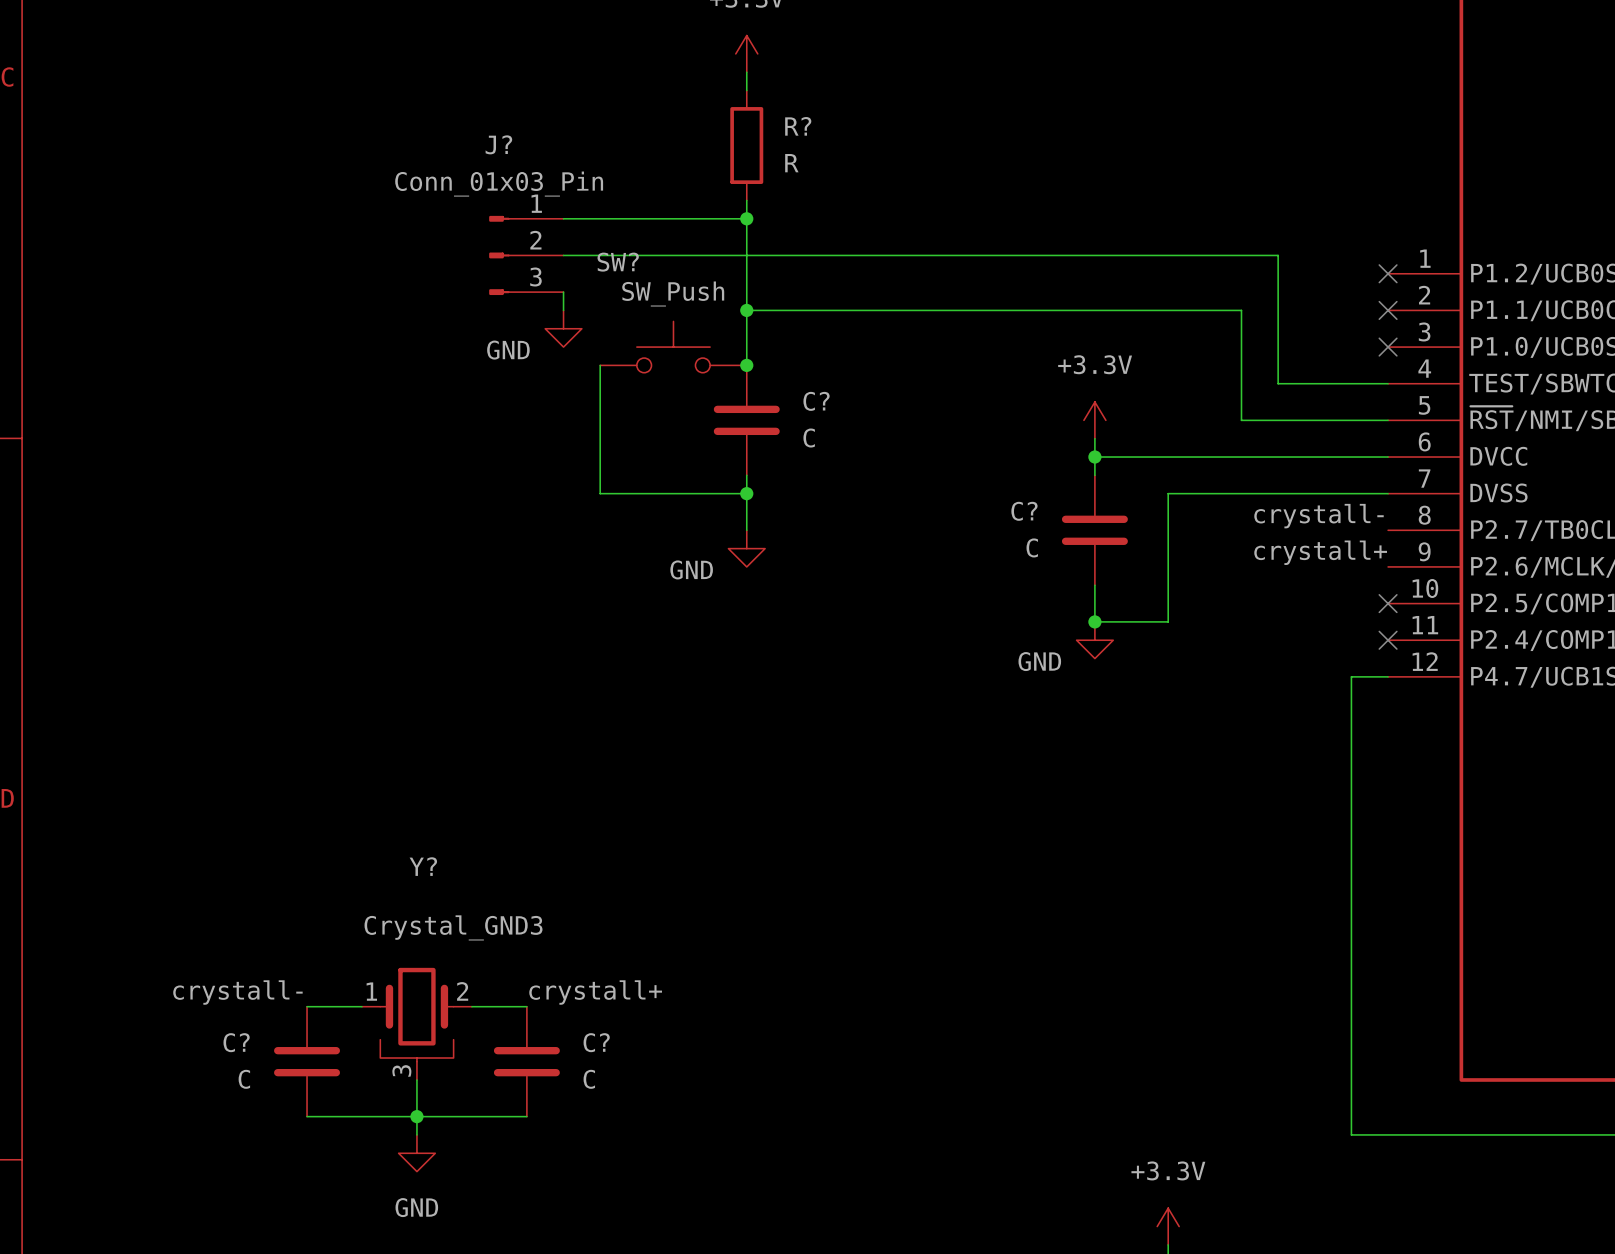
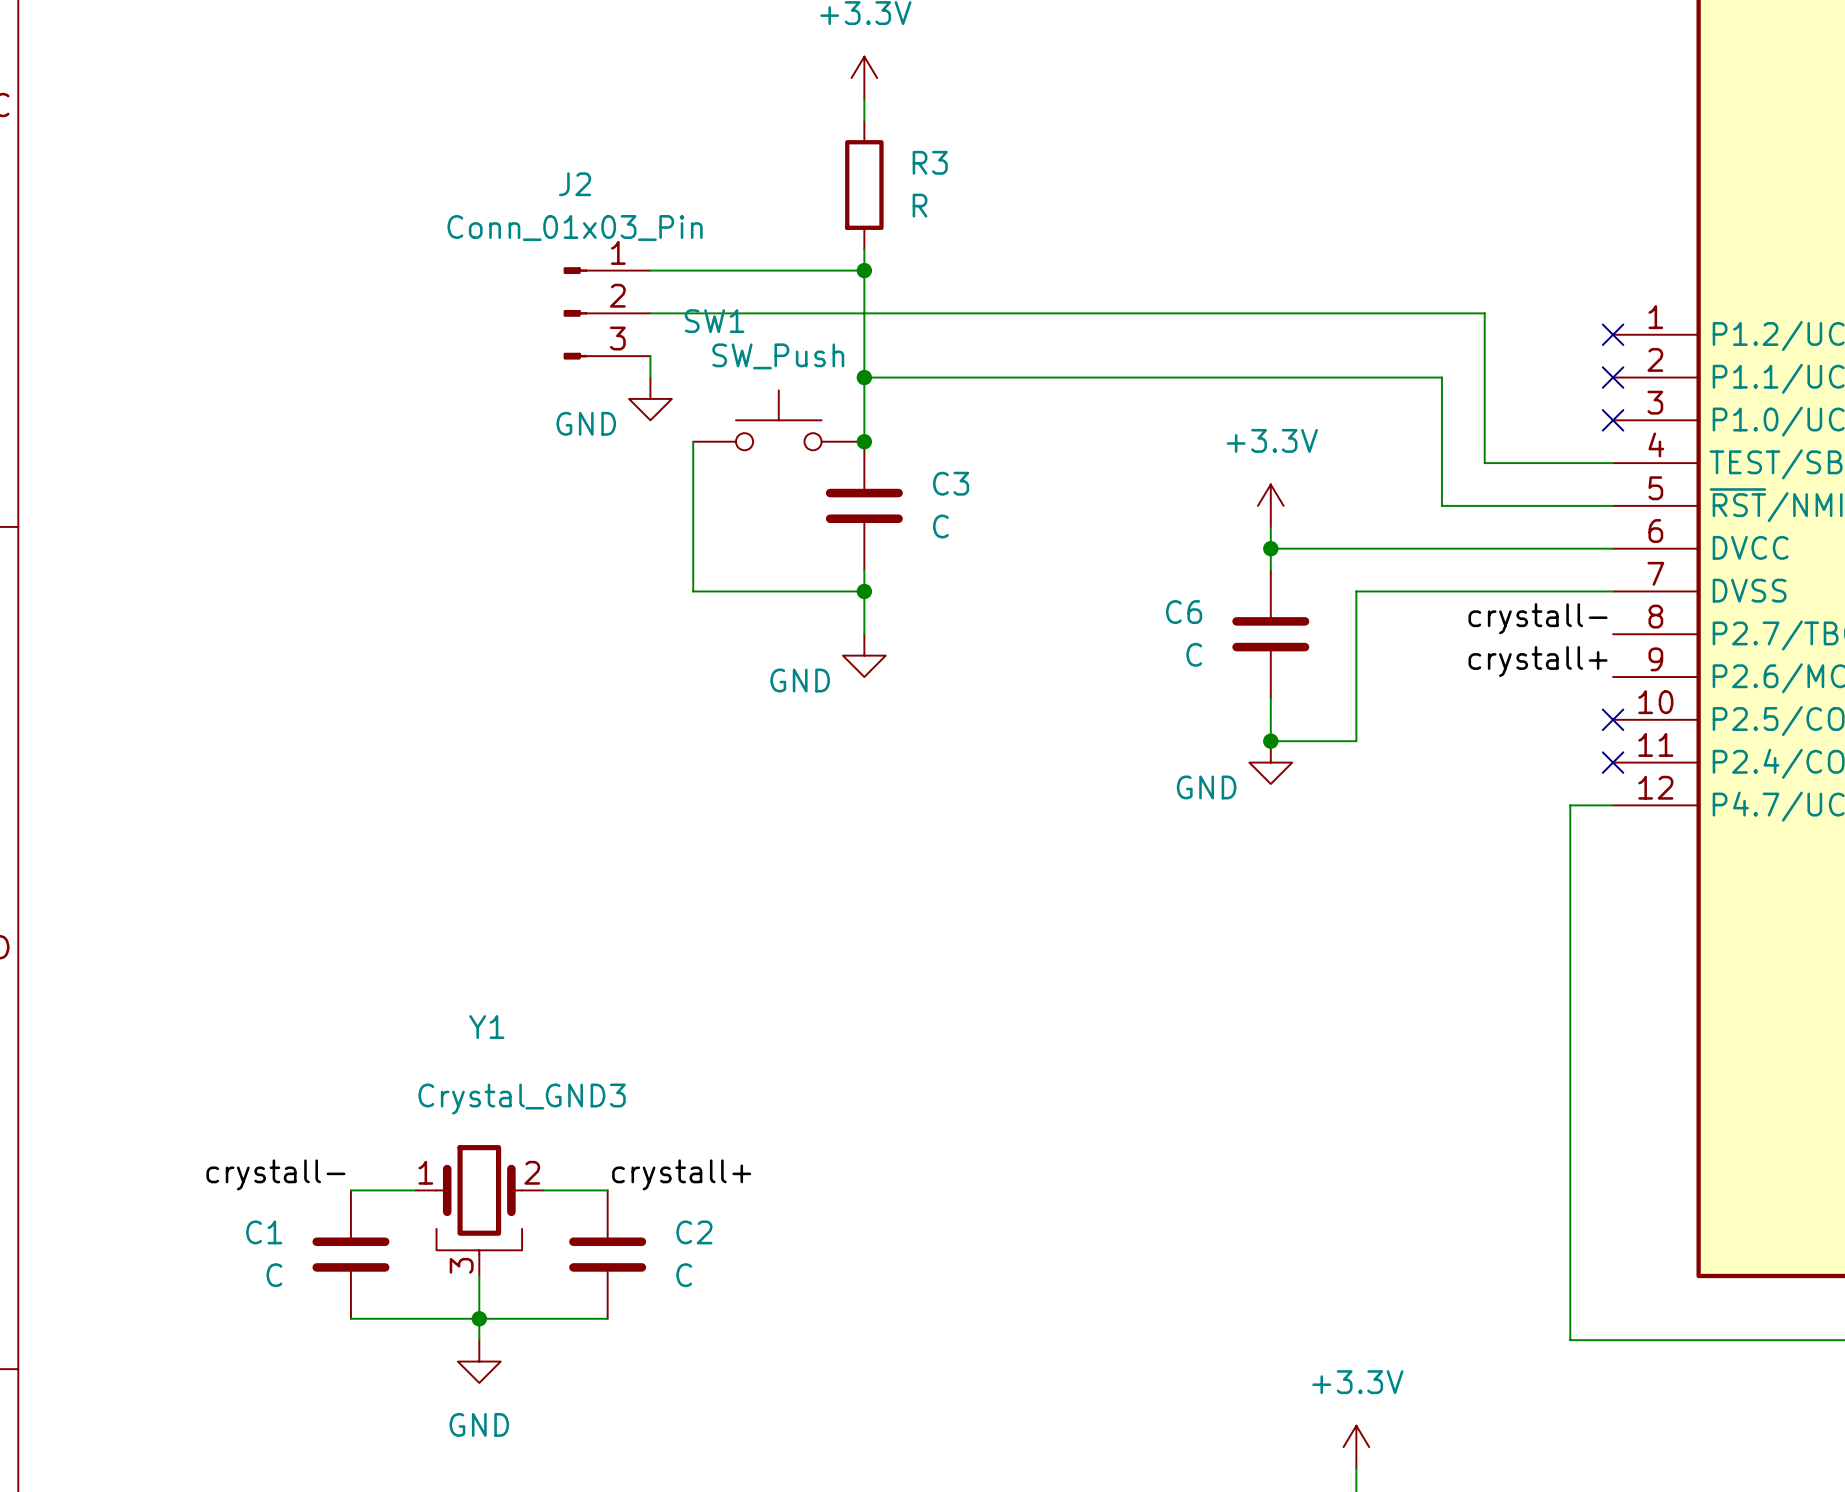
R? name: R? (798, 126) -> R3 (930, 162)
J? name: J? (498, 144) -> J2 (575, 184)
SW? name: SW? (618, 262) -> SW1 (714, 321)
C? name: C? (816, 401) -> C3 (951, 483)
C? name: C? (1024, 511) -> C6 (1184, 612)
Y? name: Y? (423, 866) -> Y1 (486, 1027)
C? name: C? (236, 1042) -> C1 (264, 1232)
C? name: C? (596, 1042) -> C2 (694, 1232)

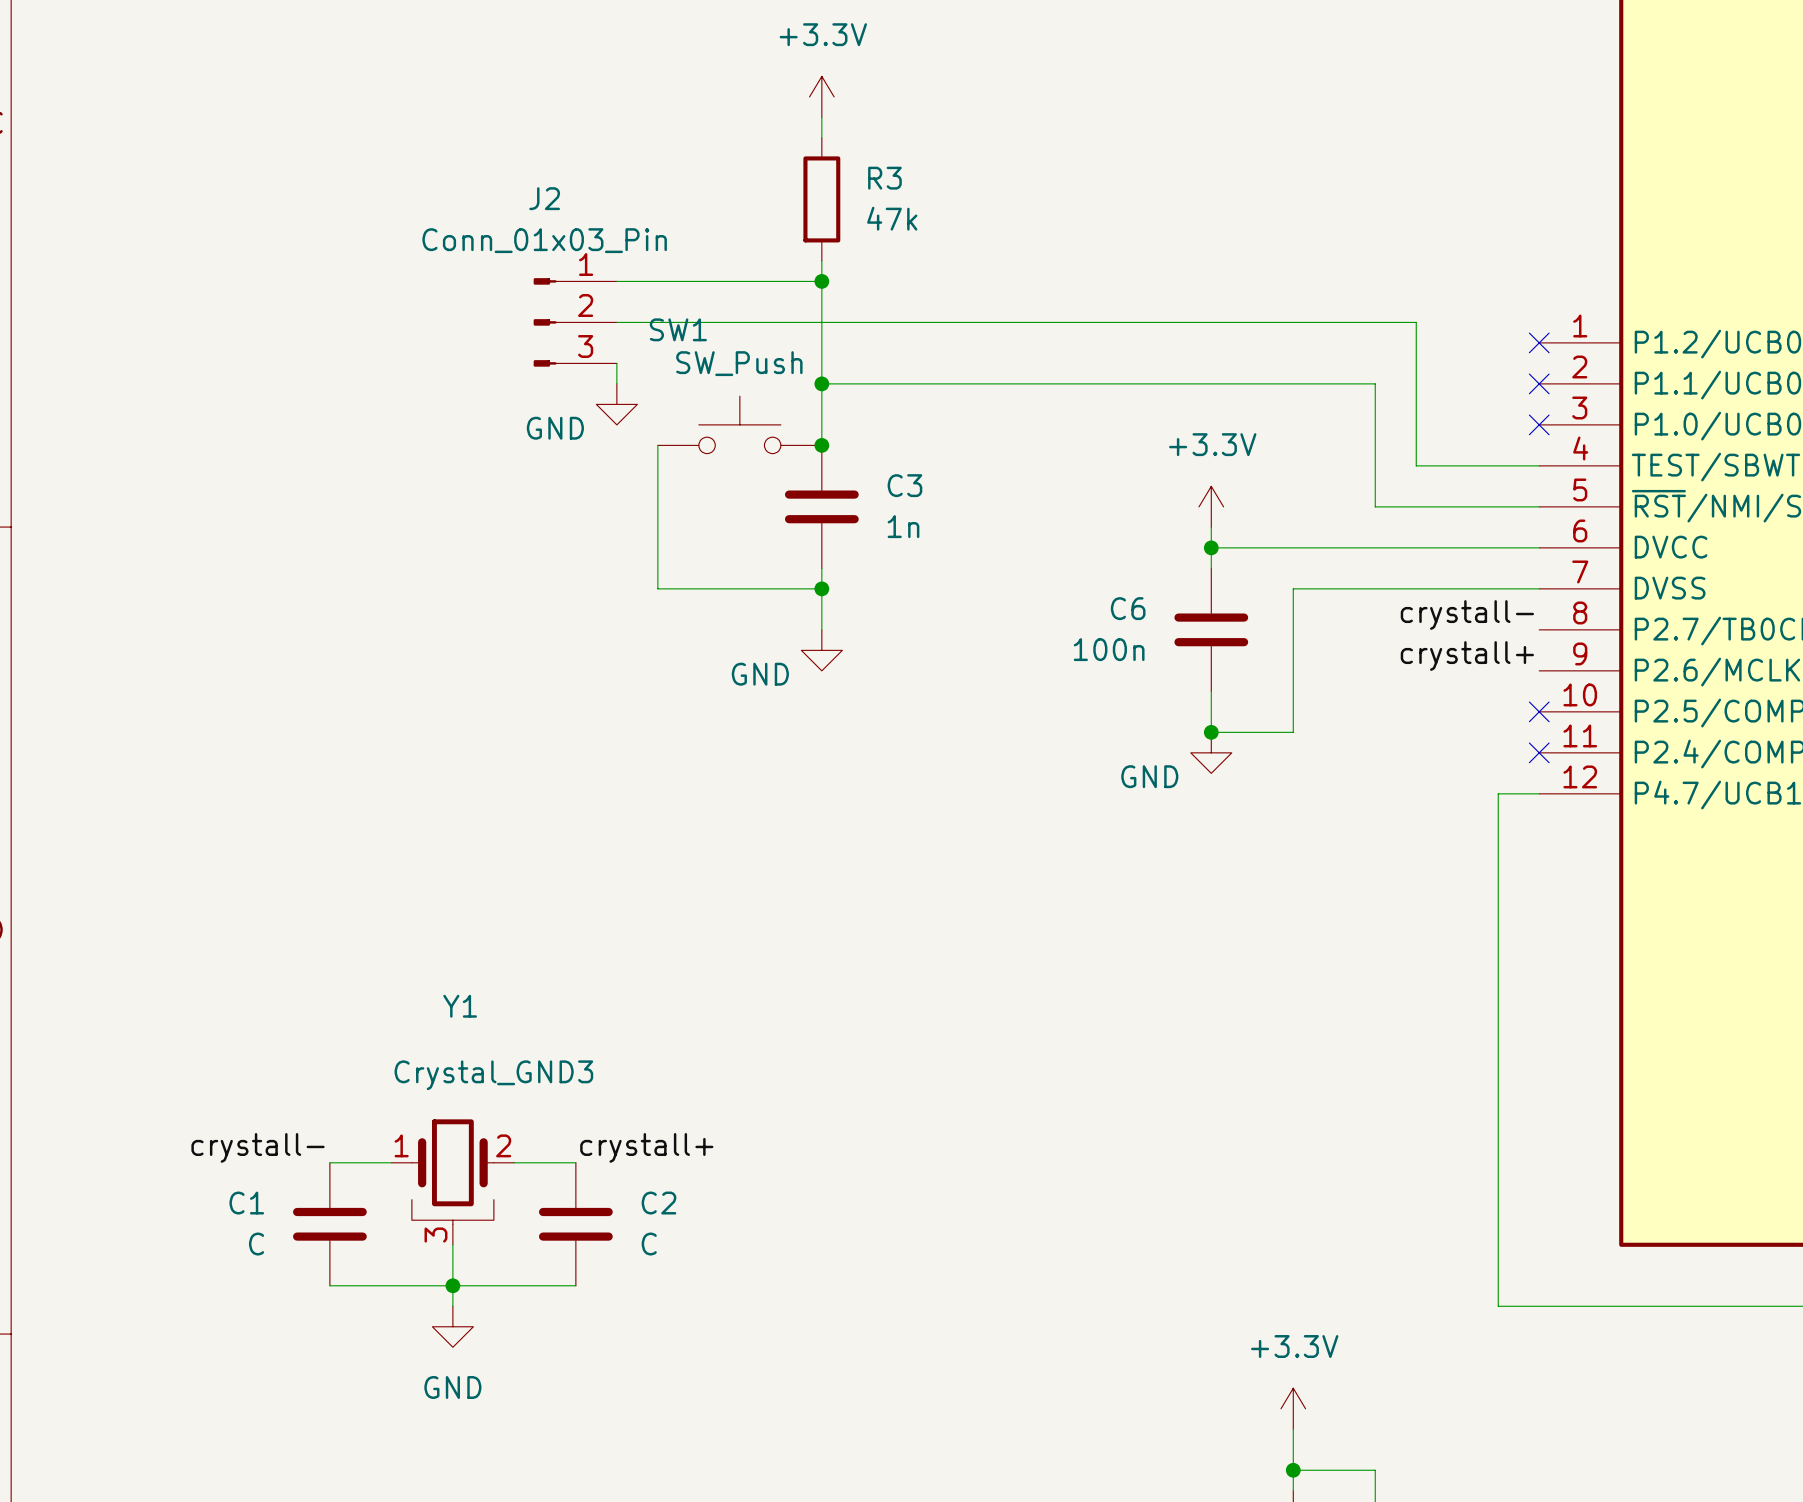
R3 value: R (920, 205) -> 47k (892, 218)
C3 value: C (940, 526) -> 1n (903, 526)
C6 value: C (1194, 654) -> 100n (1109, 649)

